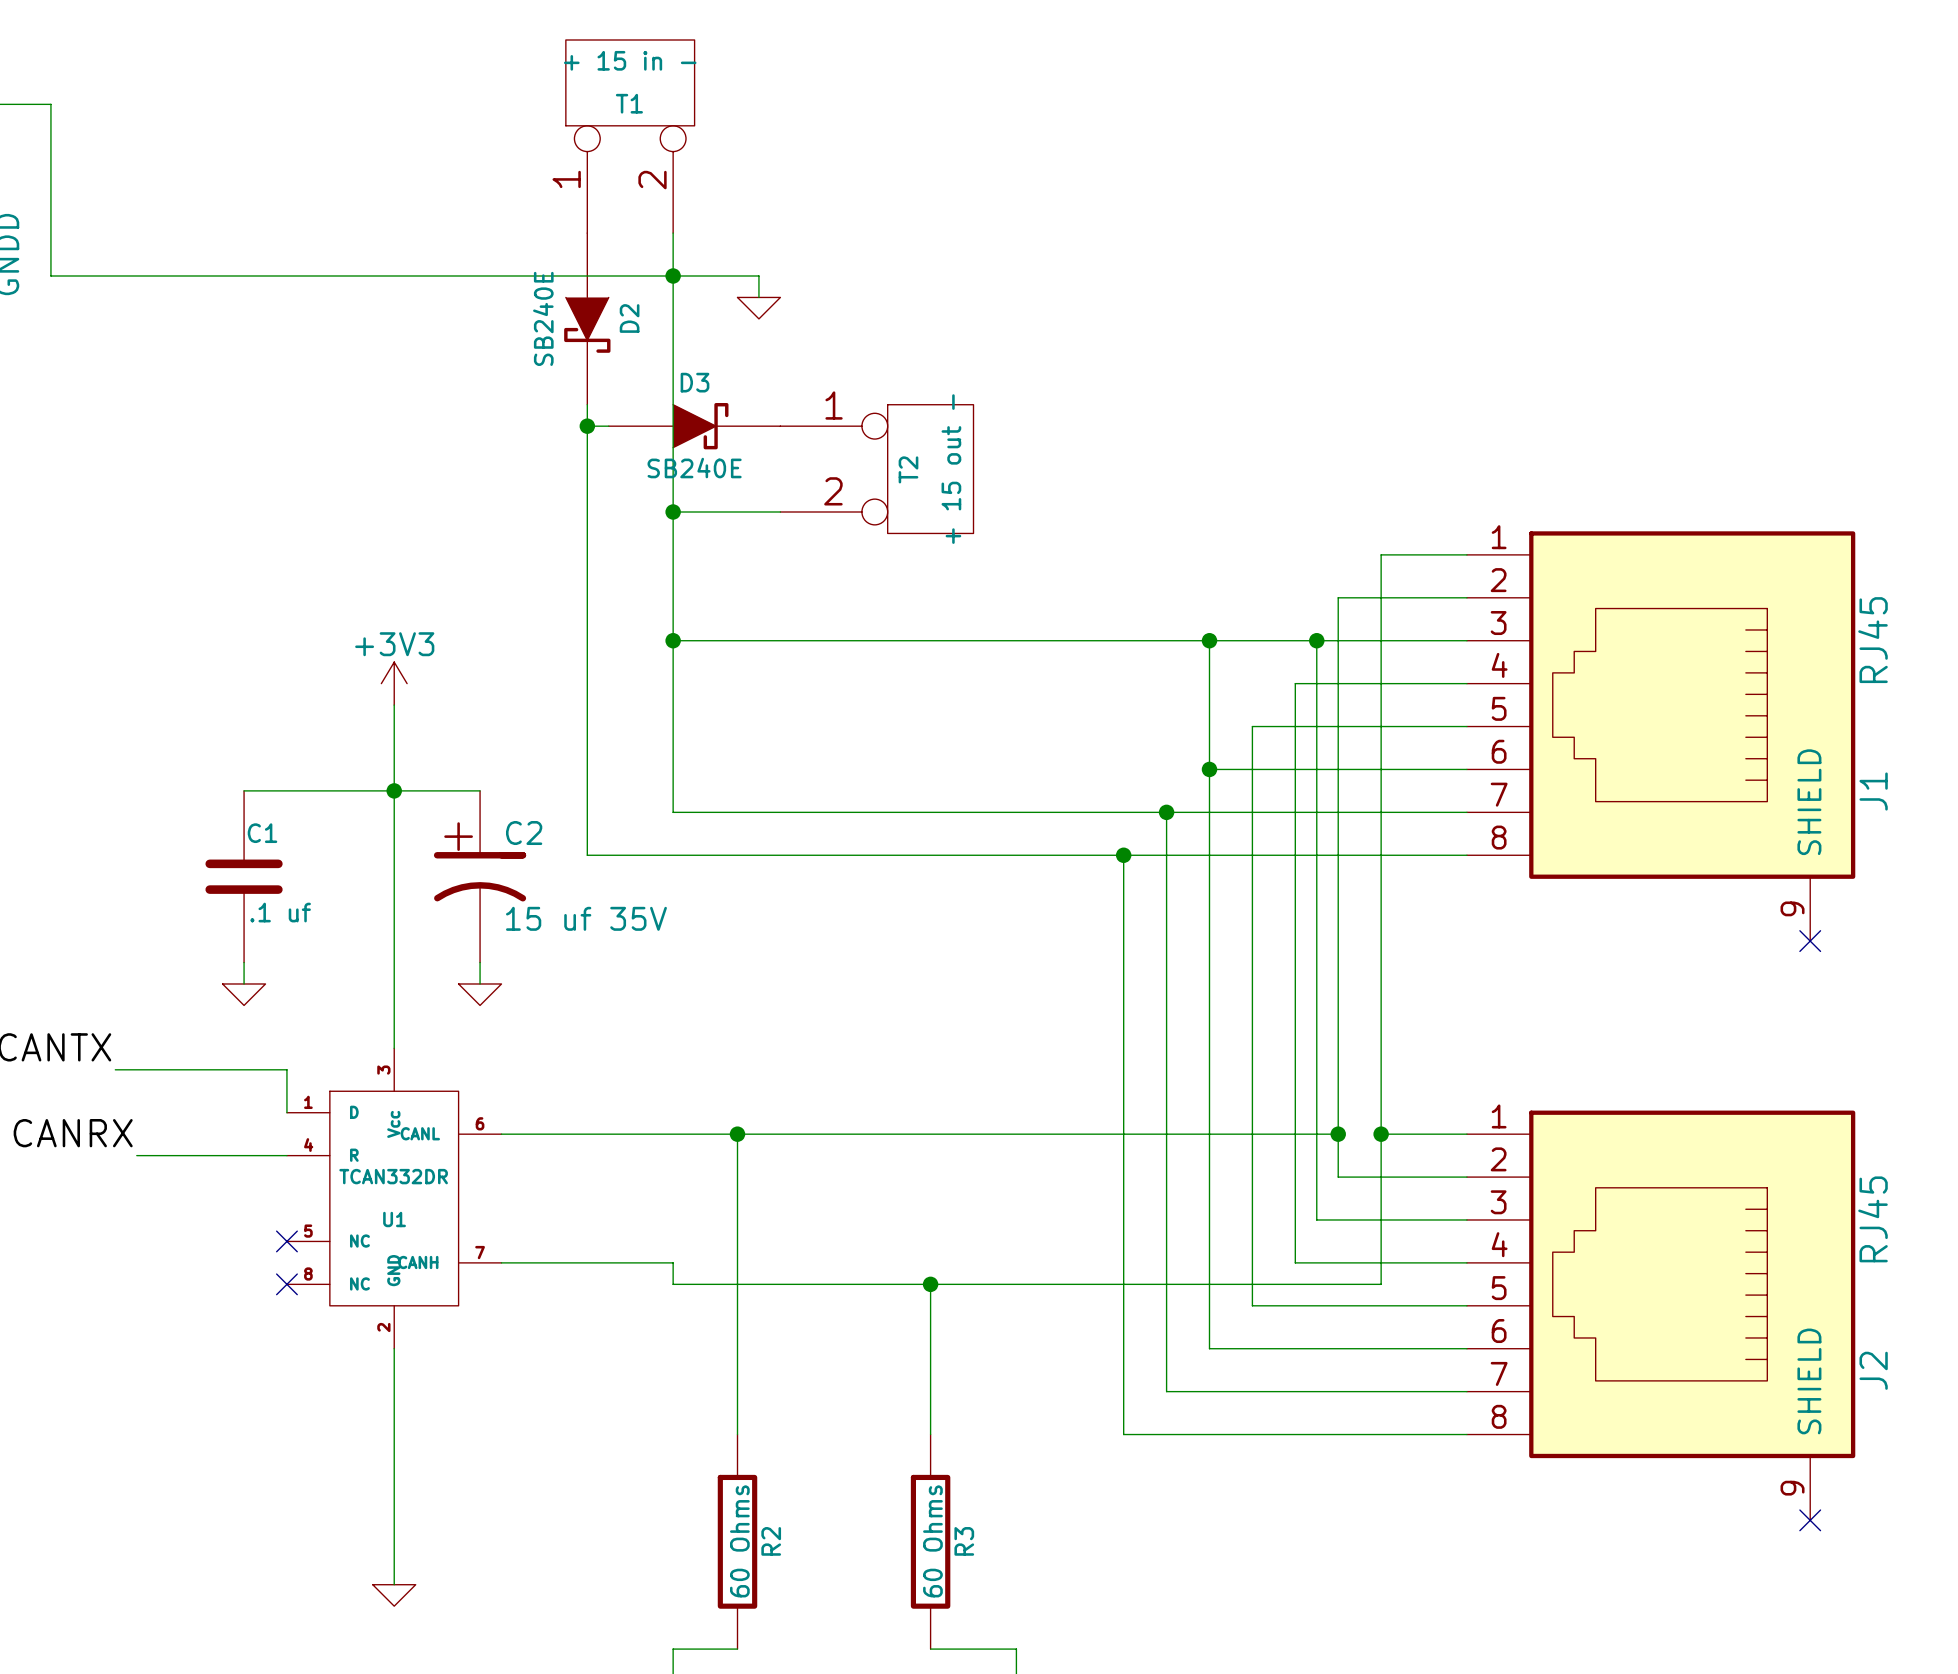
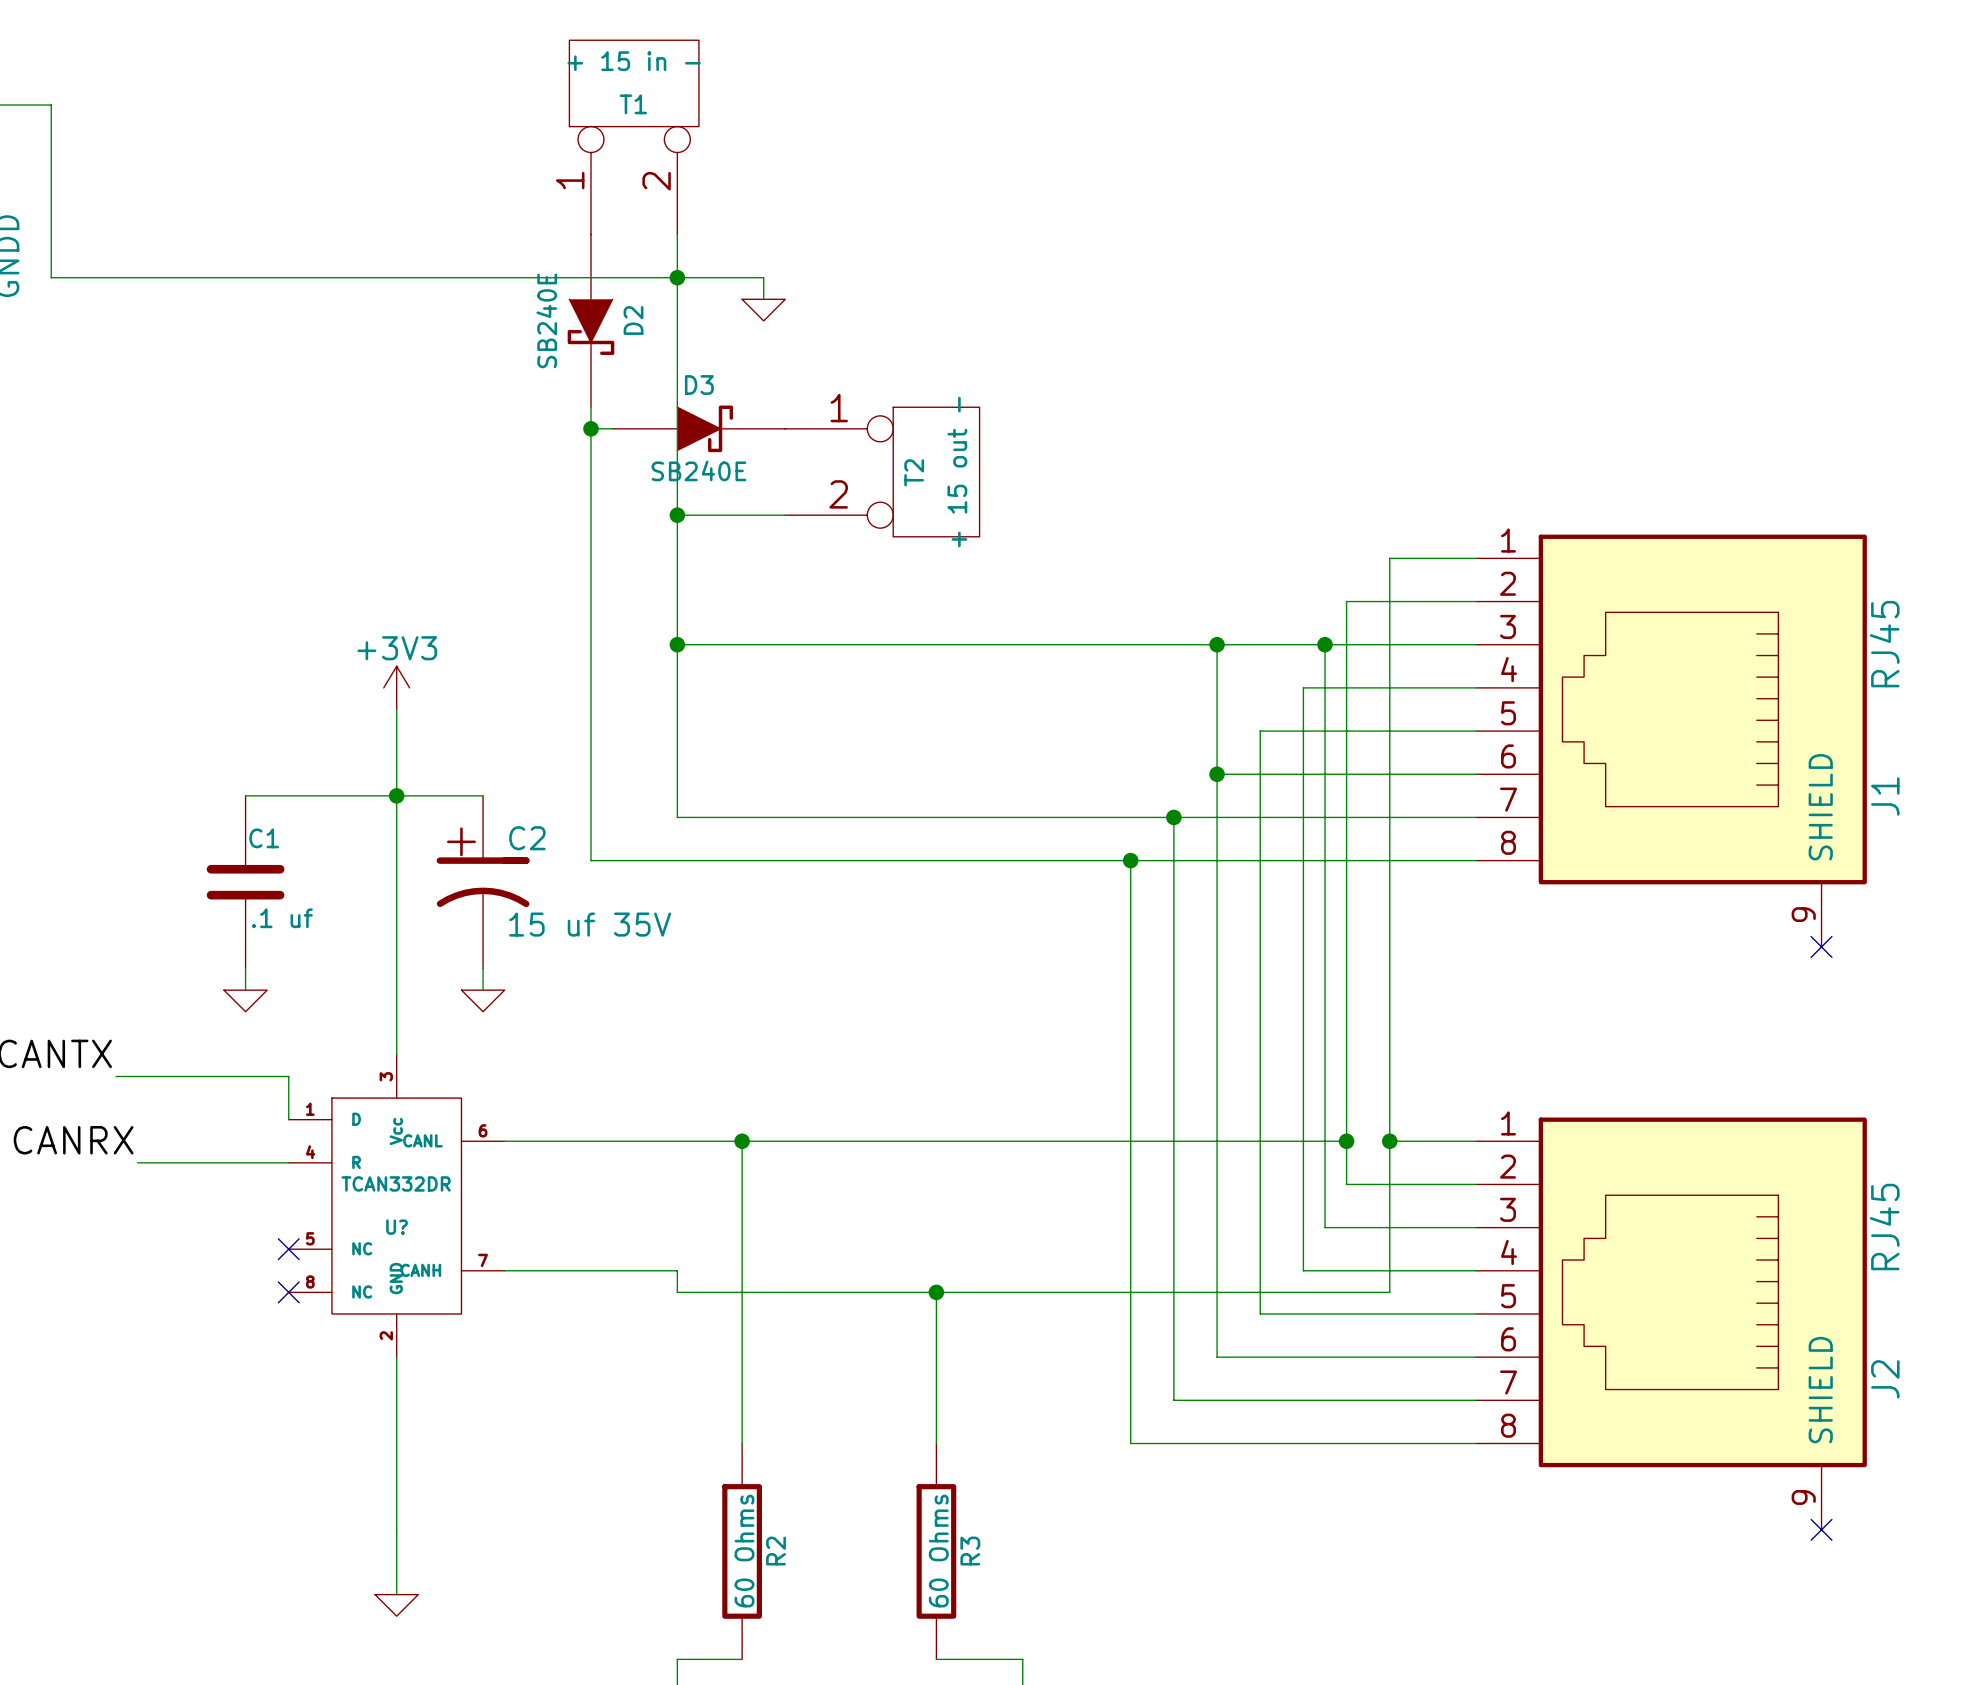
U1 name: U1 (394, 1219) -> U? (397, 1227)

